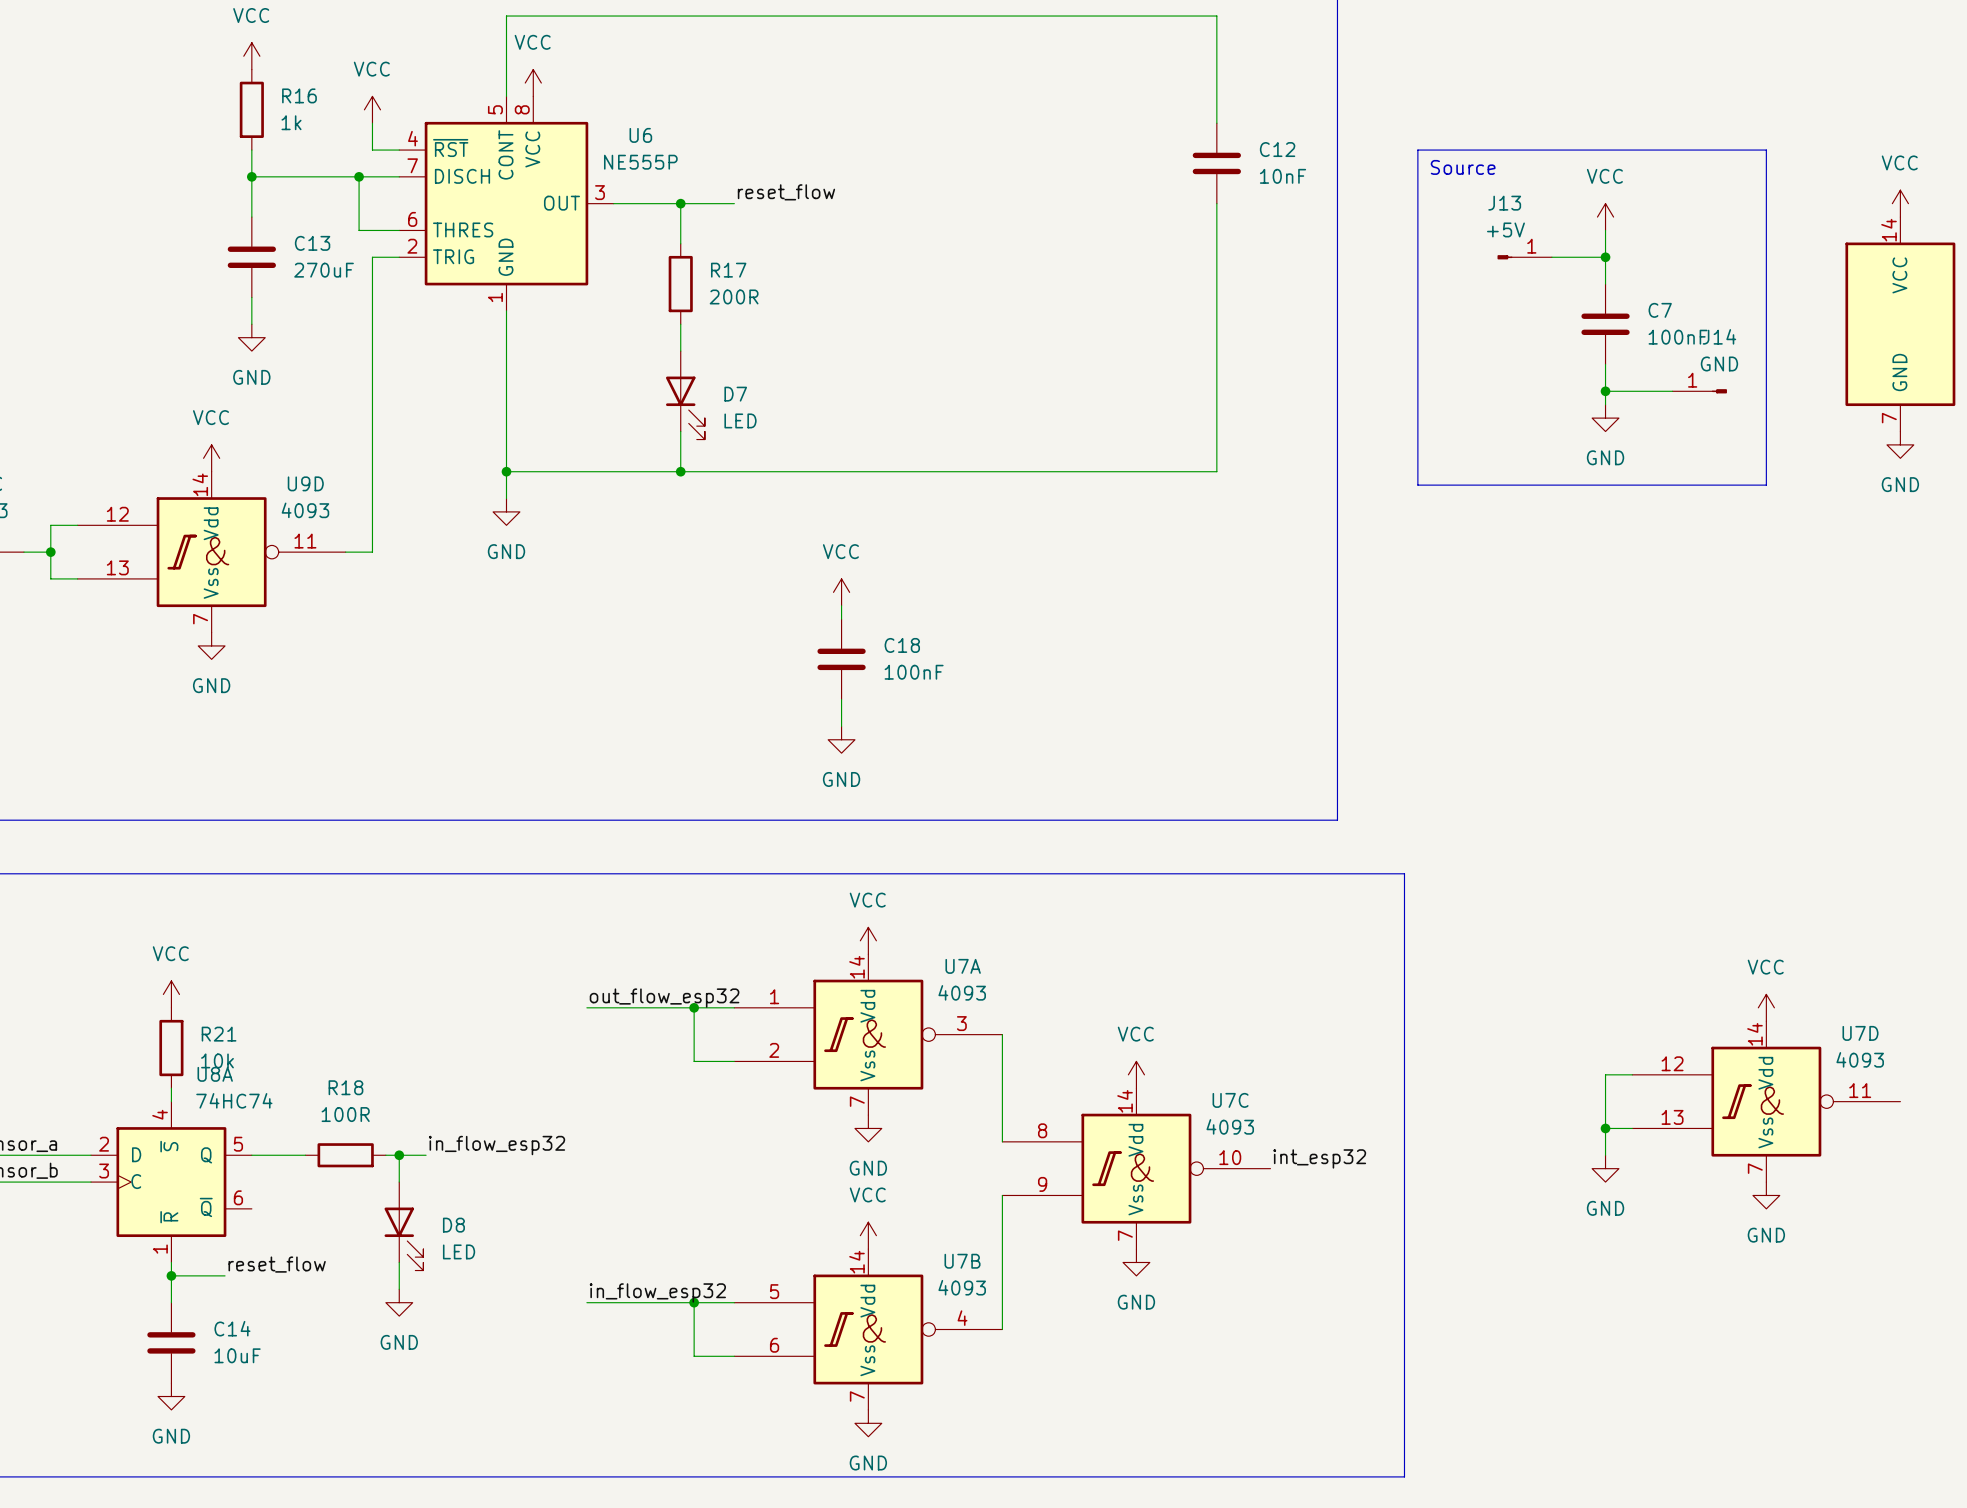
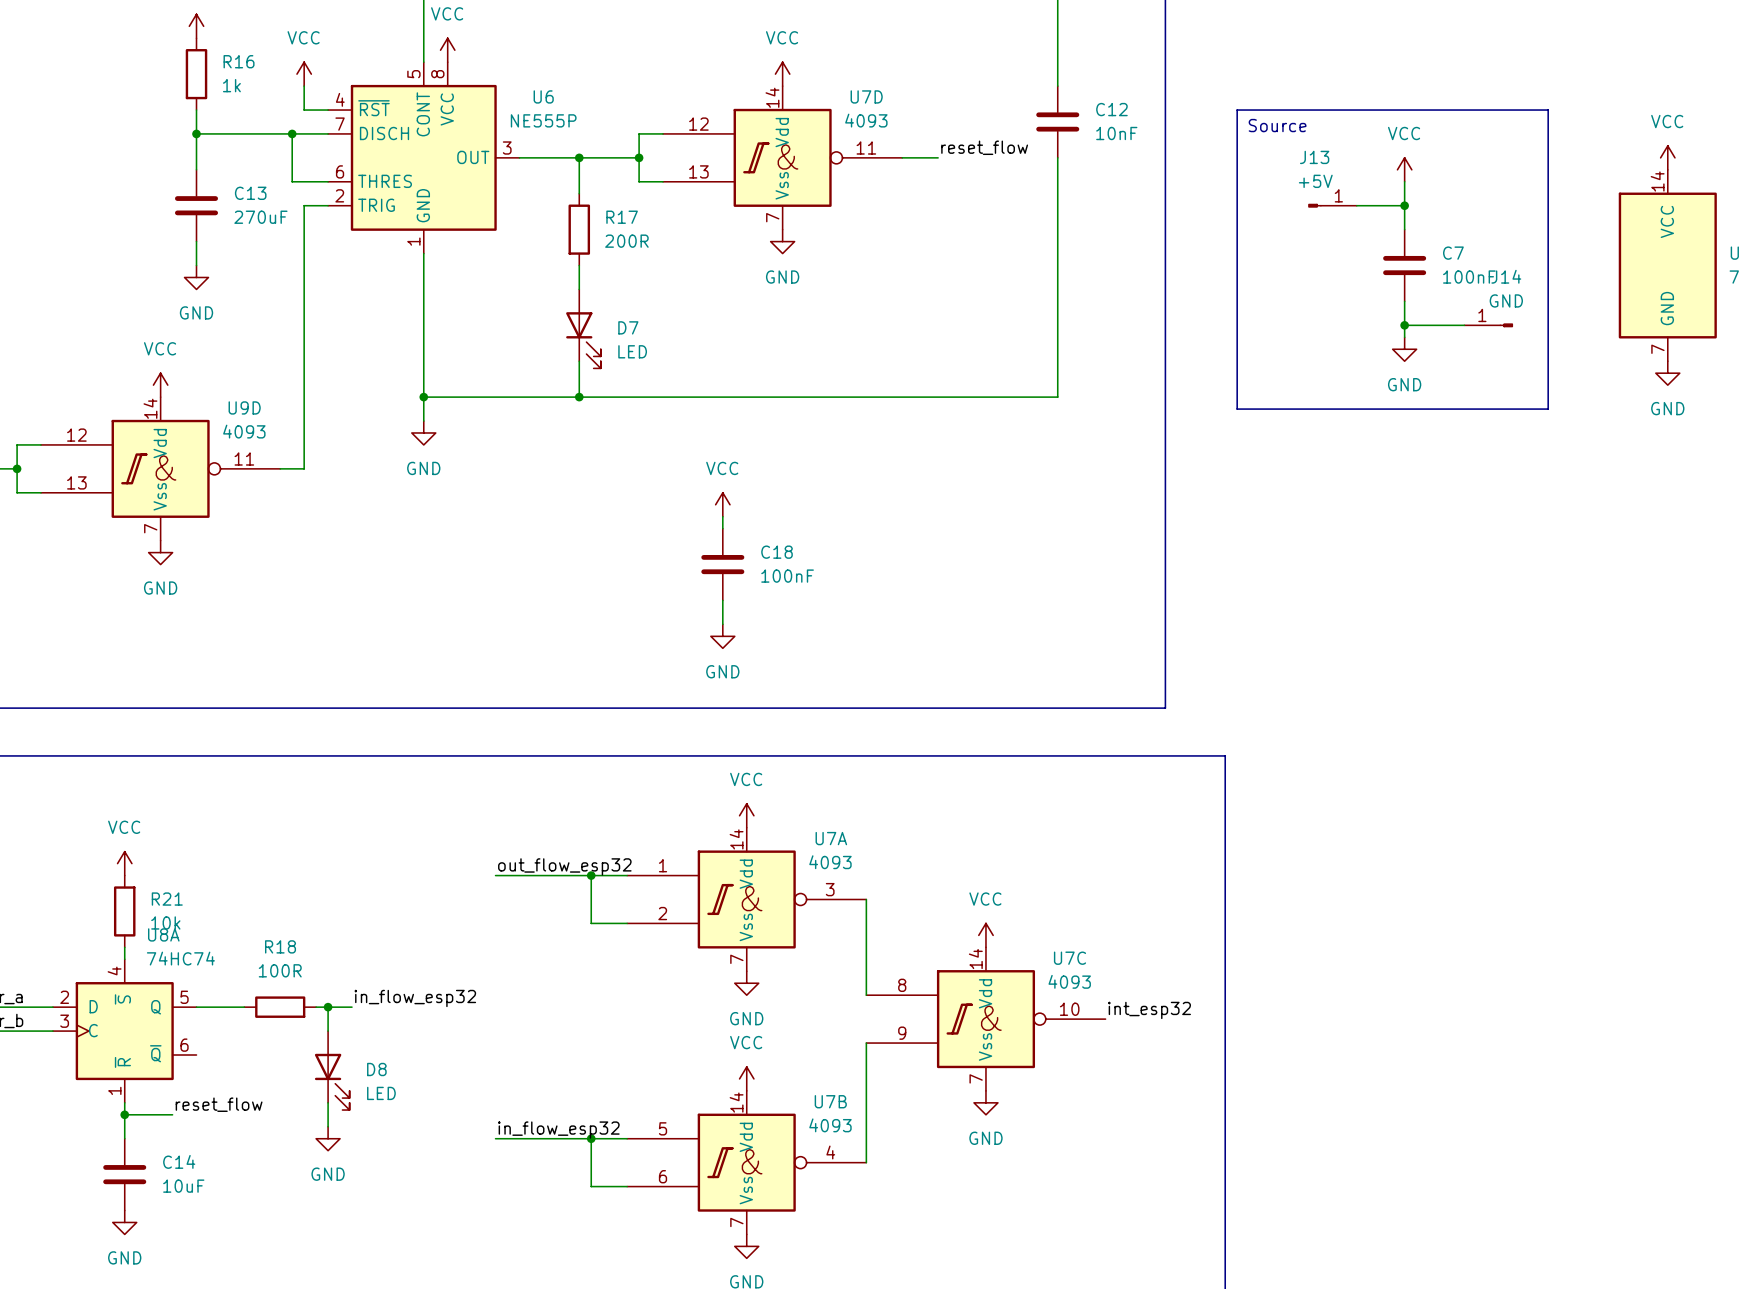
power symbol: none -> VCC (782, 74)
wire: none -> (663, 133) (639, 133) (639, 181) (663, 181)
label: reset_flow (786, 192) -> none
label: none -> reset_flow (984, 147)
wire: none -> (627, 157) (639, 157)
junction: none -> (639, 157)
wire: none -> (902, 157) (938, 157)
power symbol: none -> GND (782, 241)
power symbol: VCC (1766, 1007) -> none
wire: (1632, 1074) (1605, 1074) (1605, 1155) -> none
U7D position: (1766, 1101) -> (782, 157)
wire: (1605, 1128) (1632, 1128) -> none
junction: (1605, 1128) -> none
power symbol: GND (1605, 1168) -> none
power symbol: GND (1766, 1195) -> none

